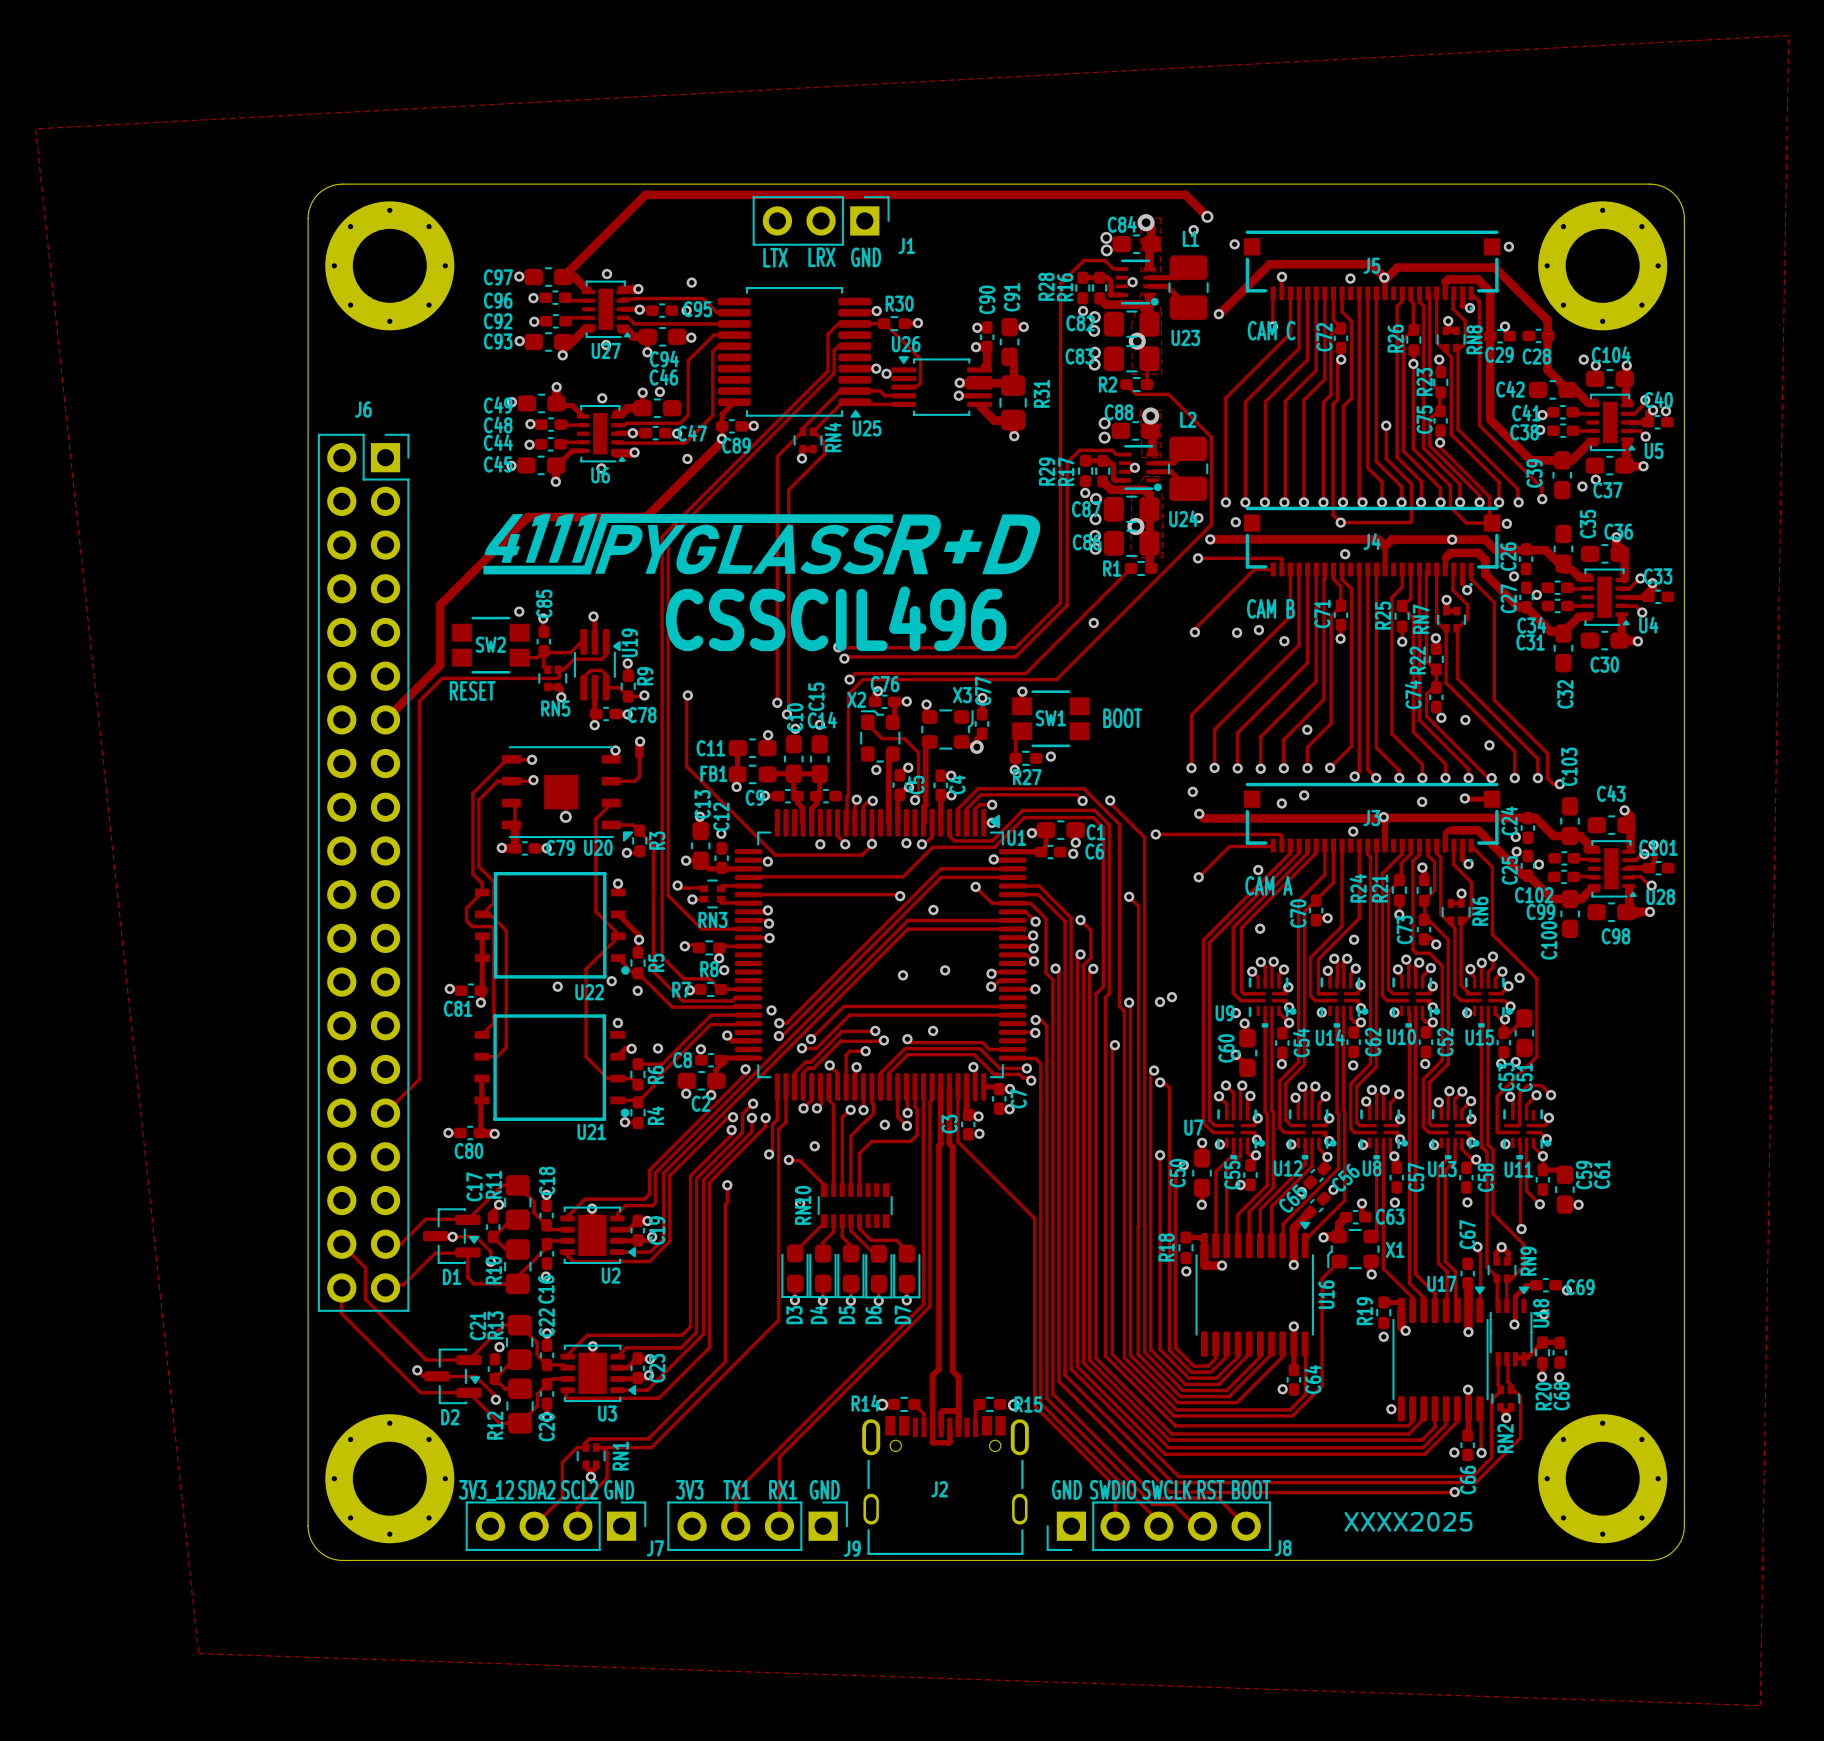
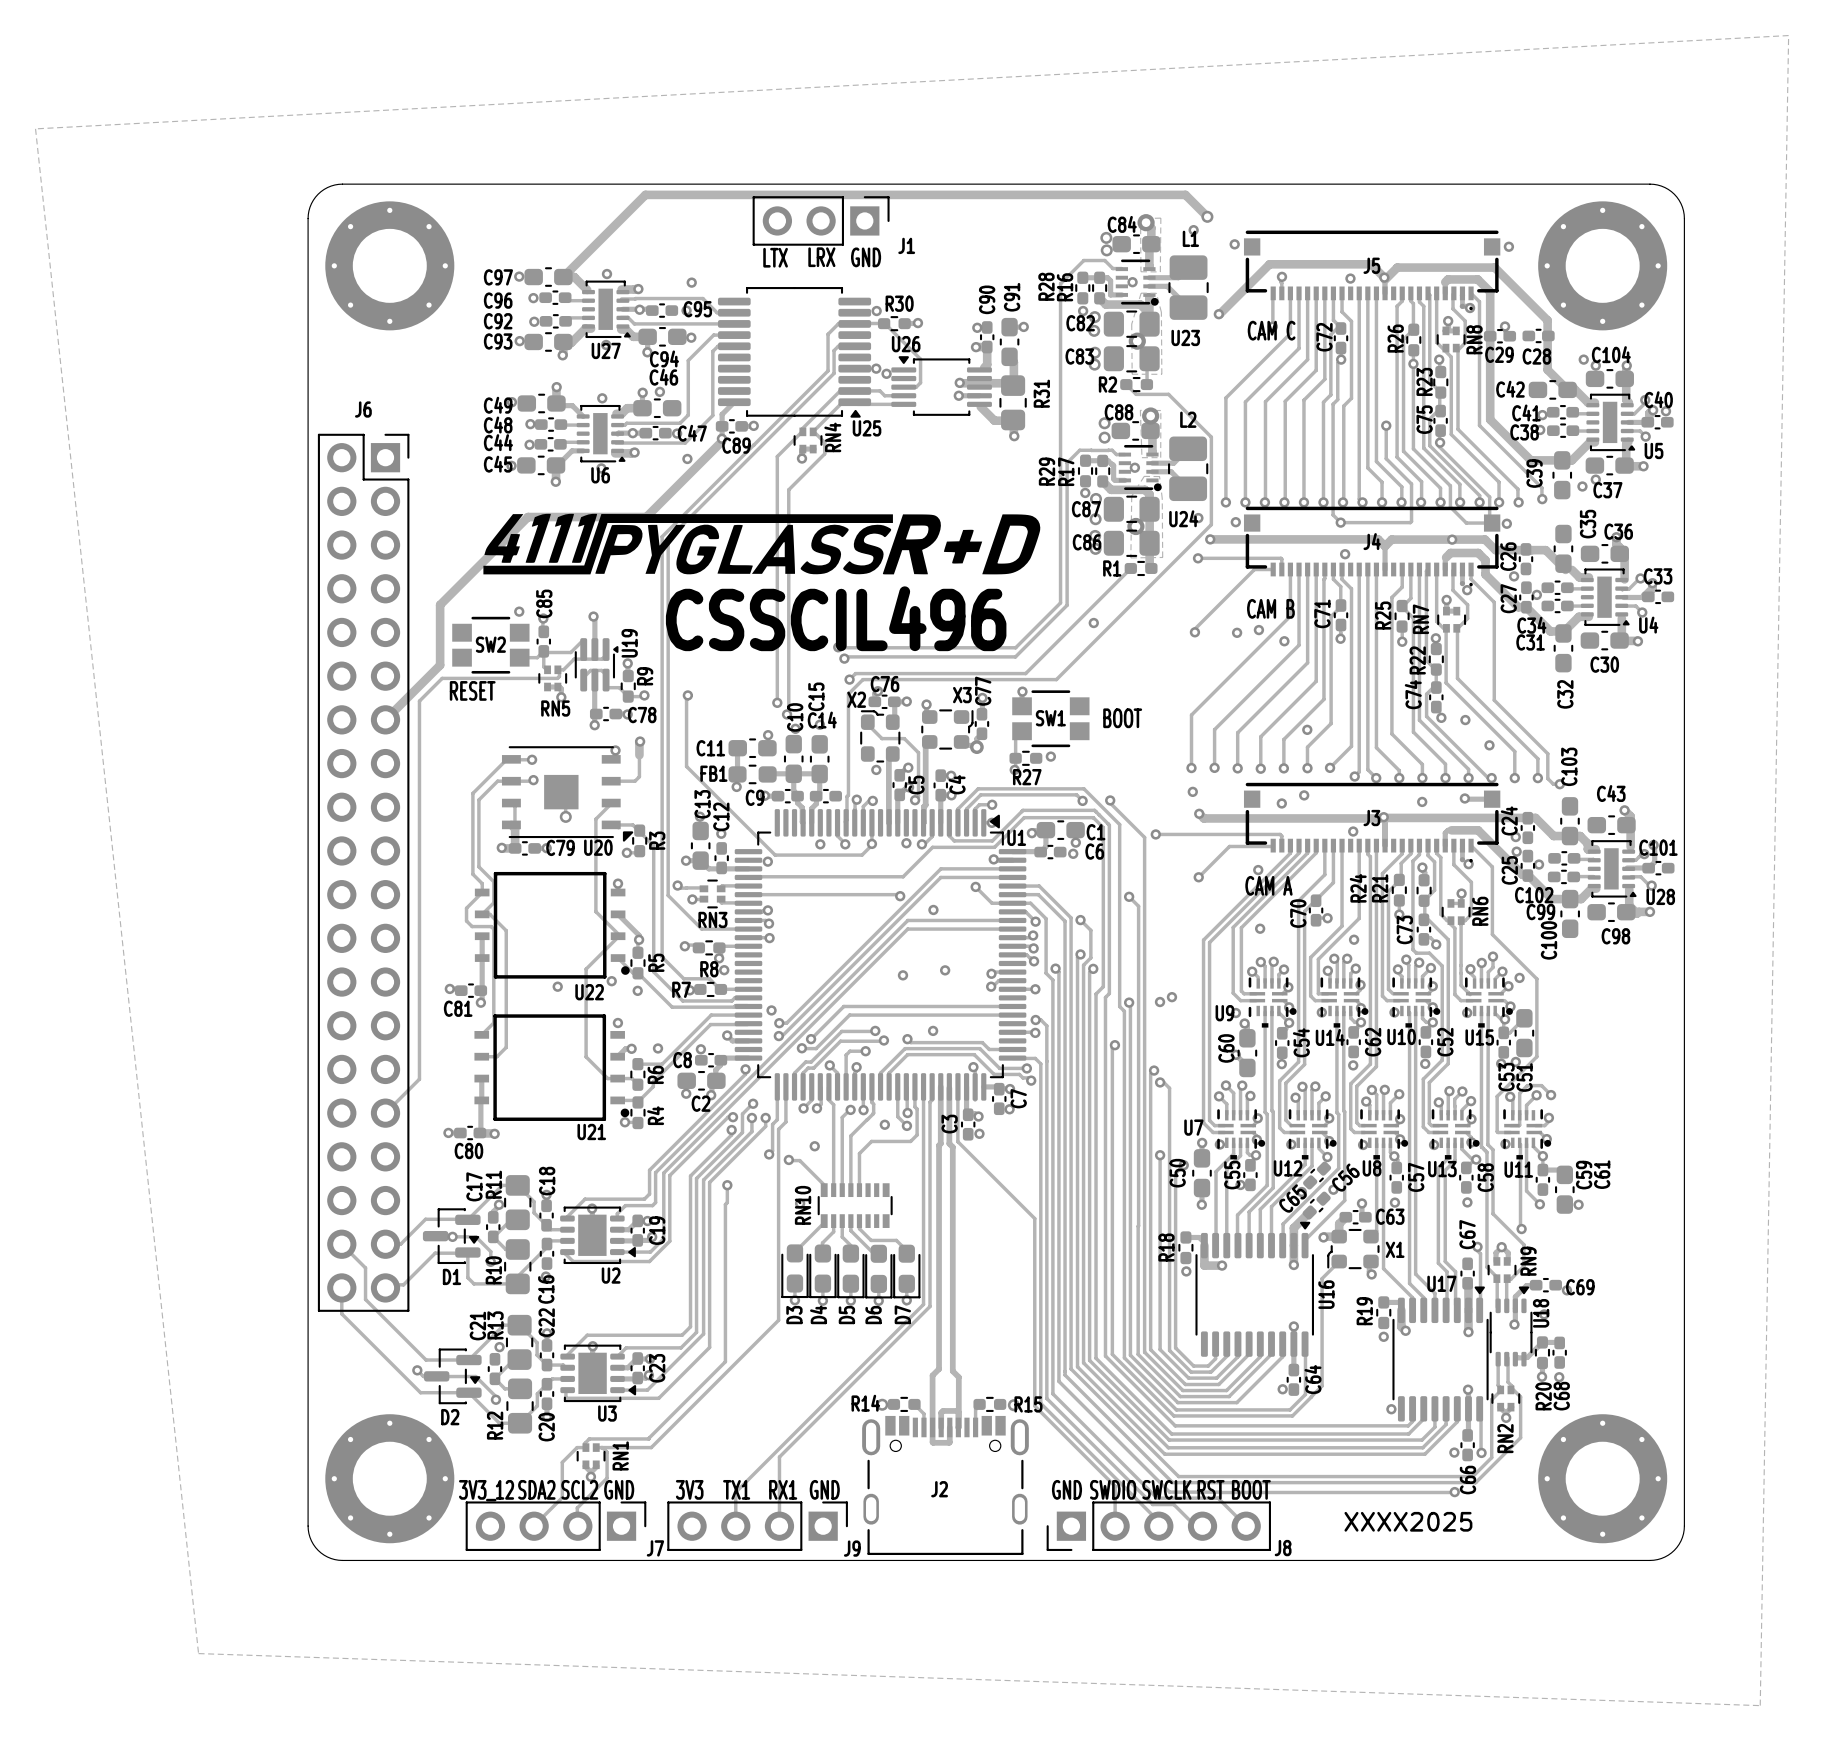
U19 footprint: [573, 629, 621, 701] -> [574, 638, 619, 692]

